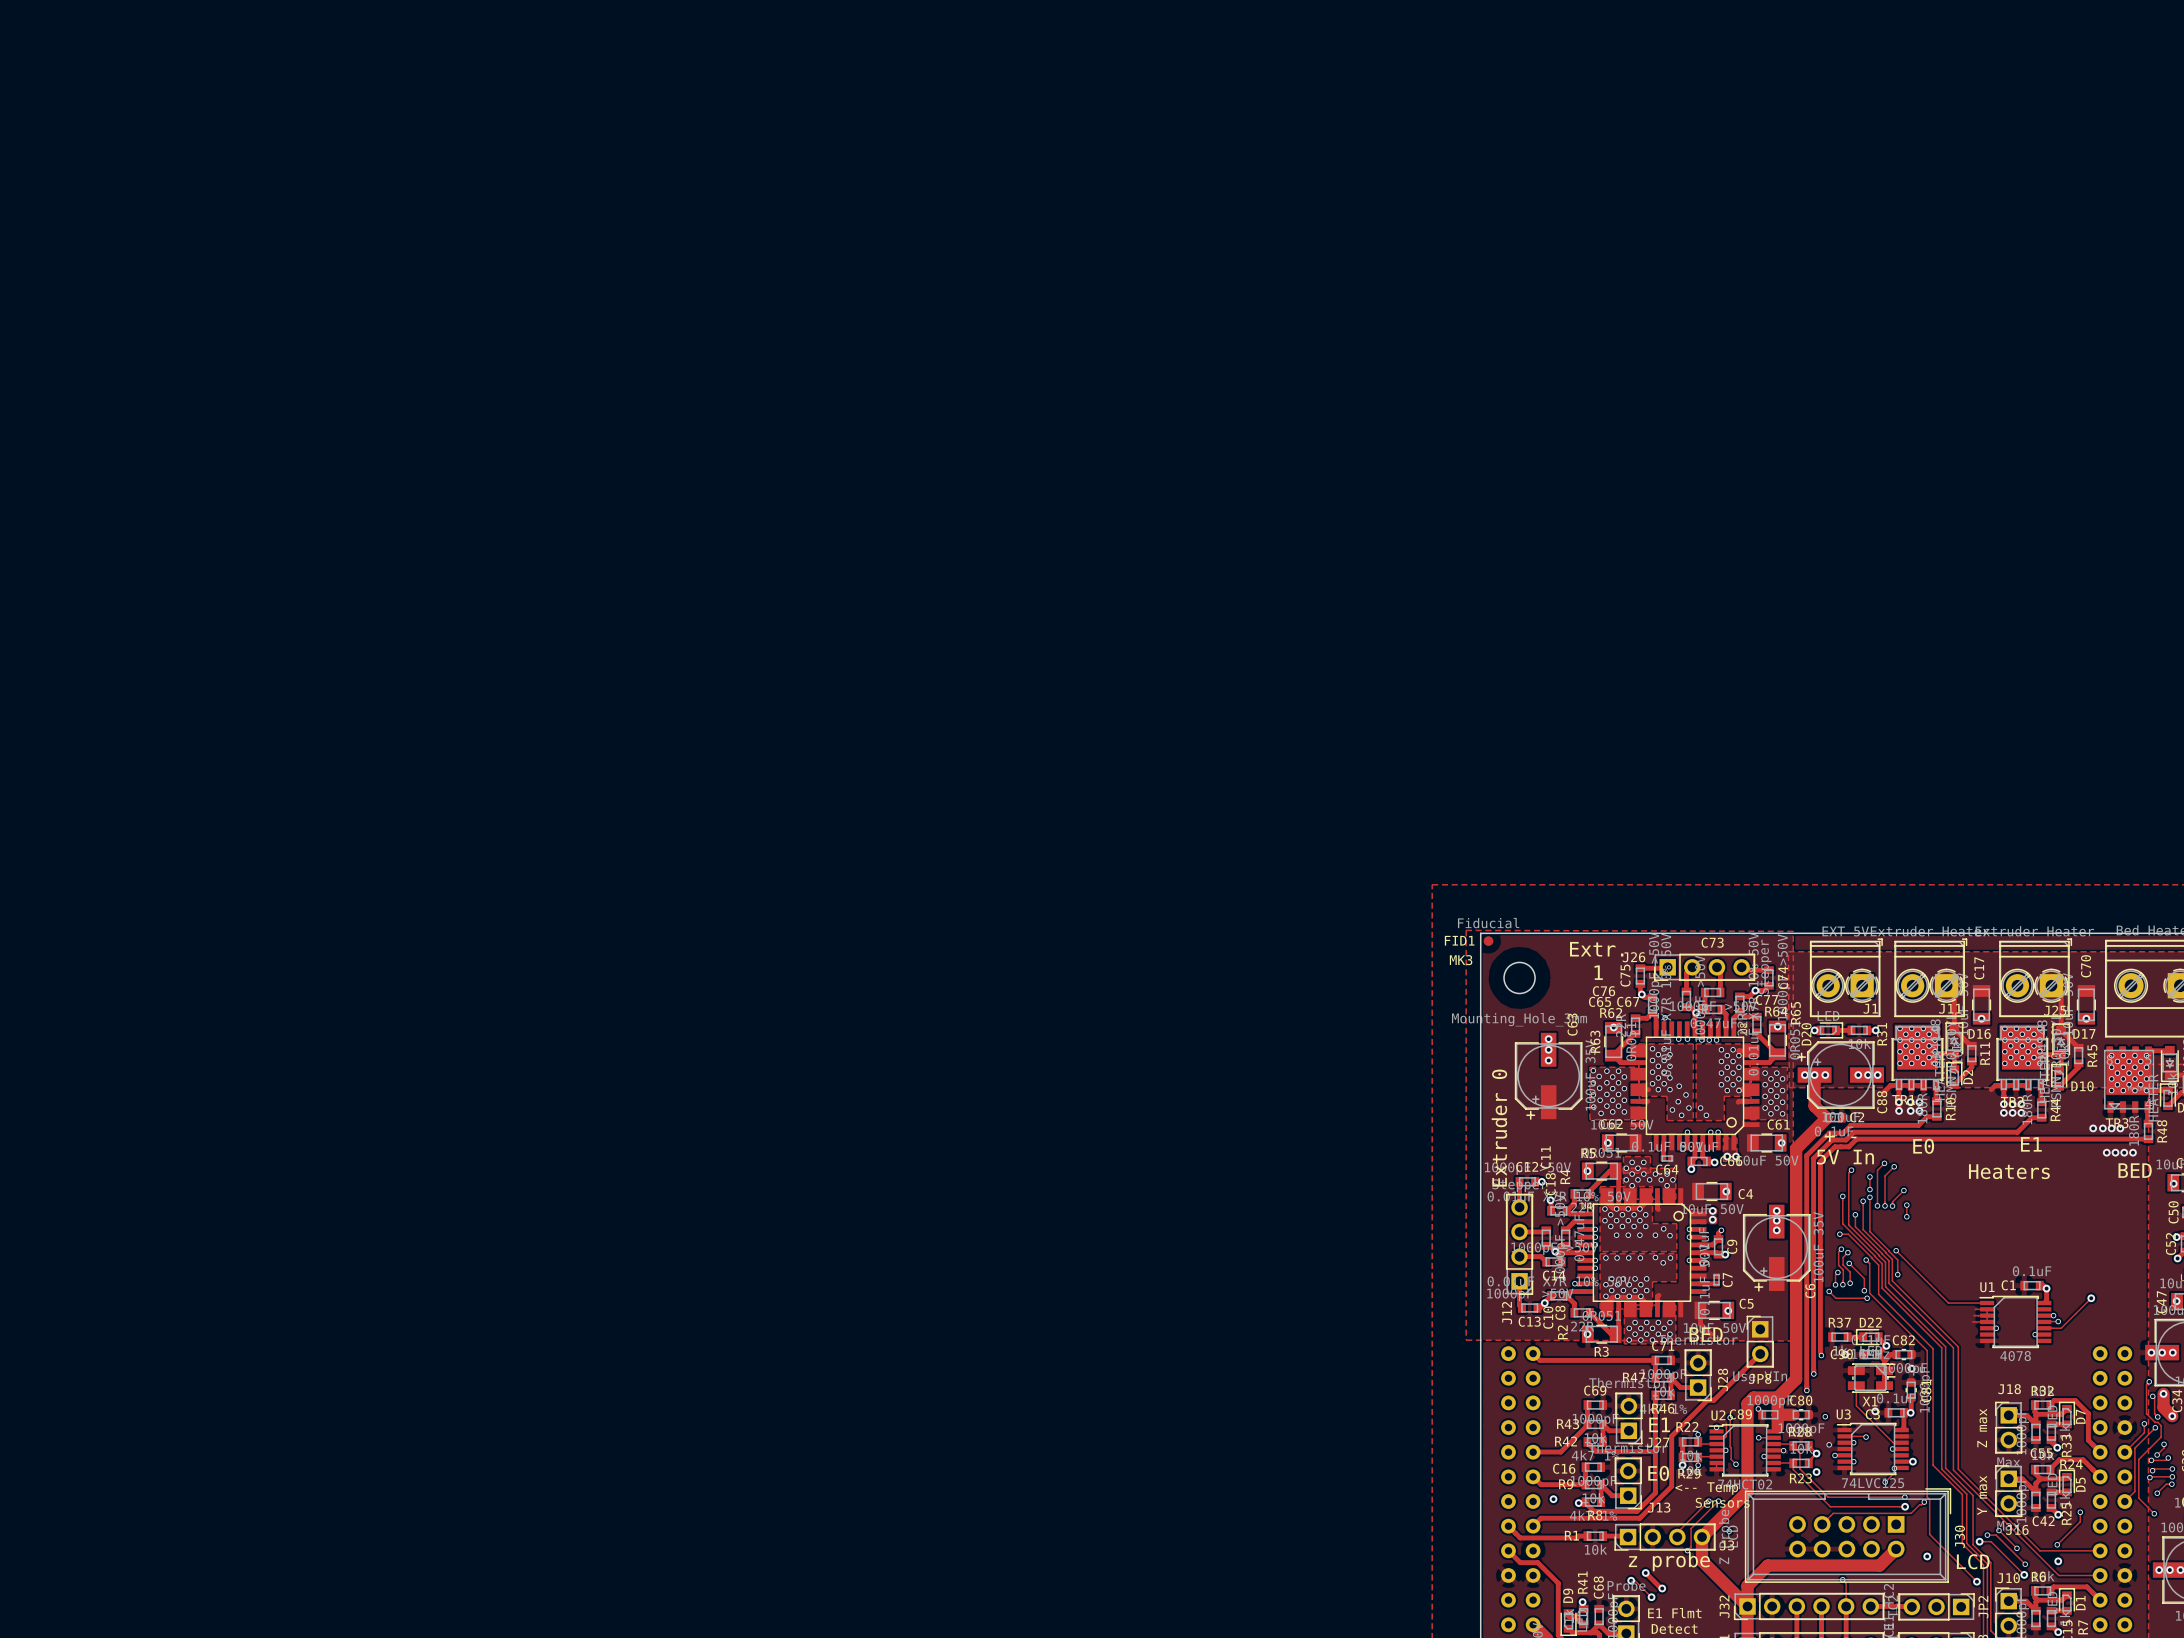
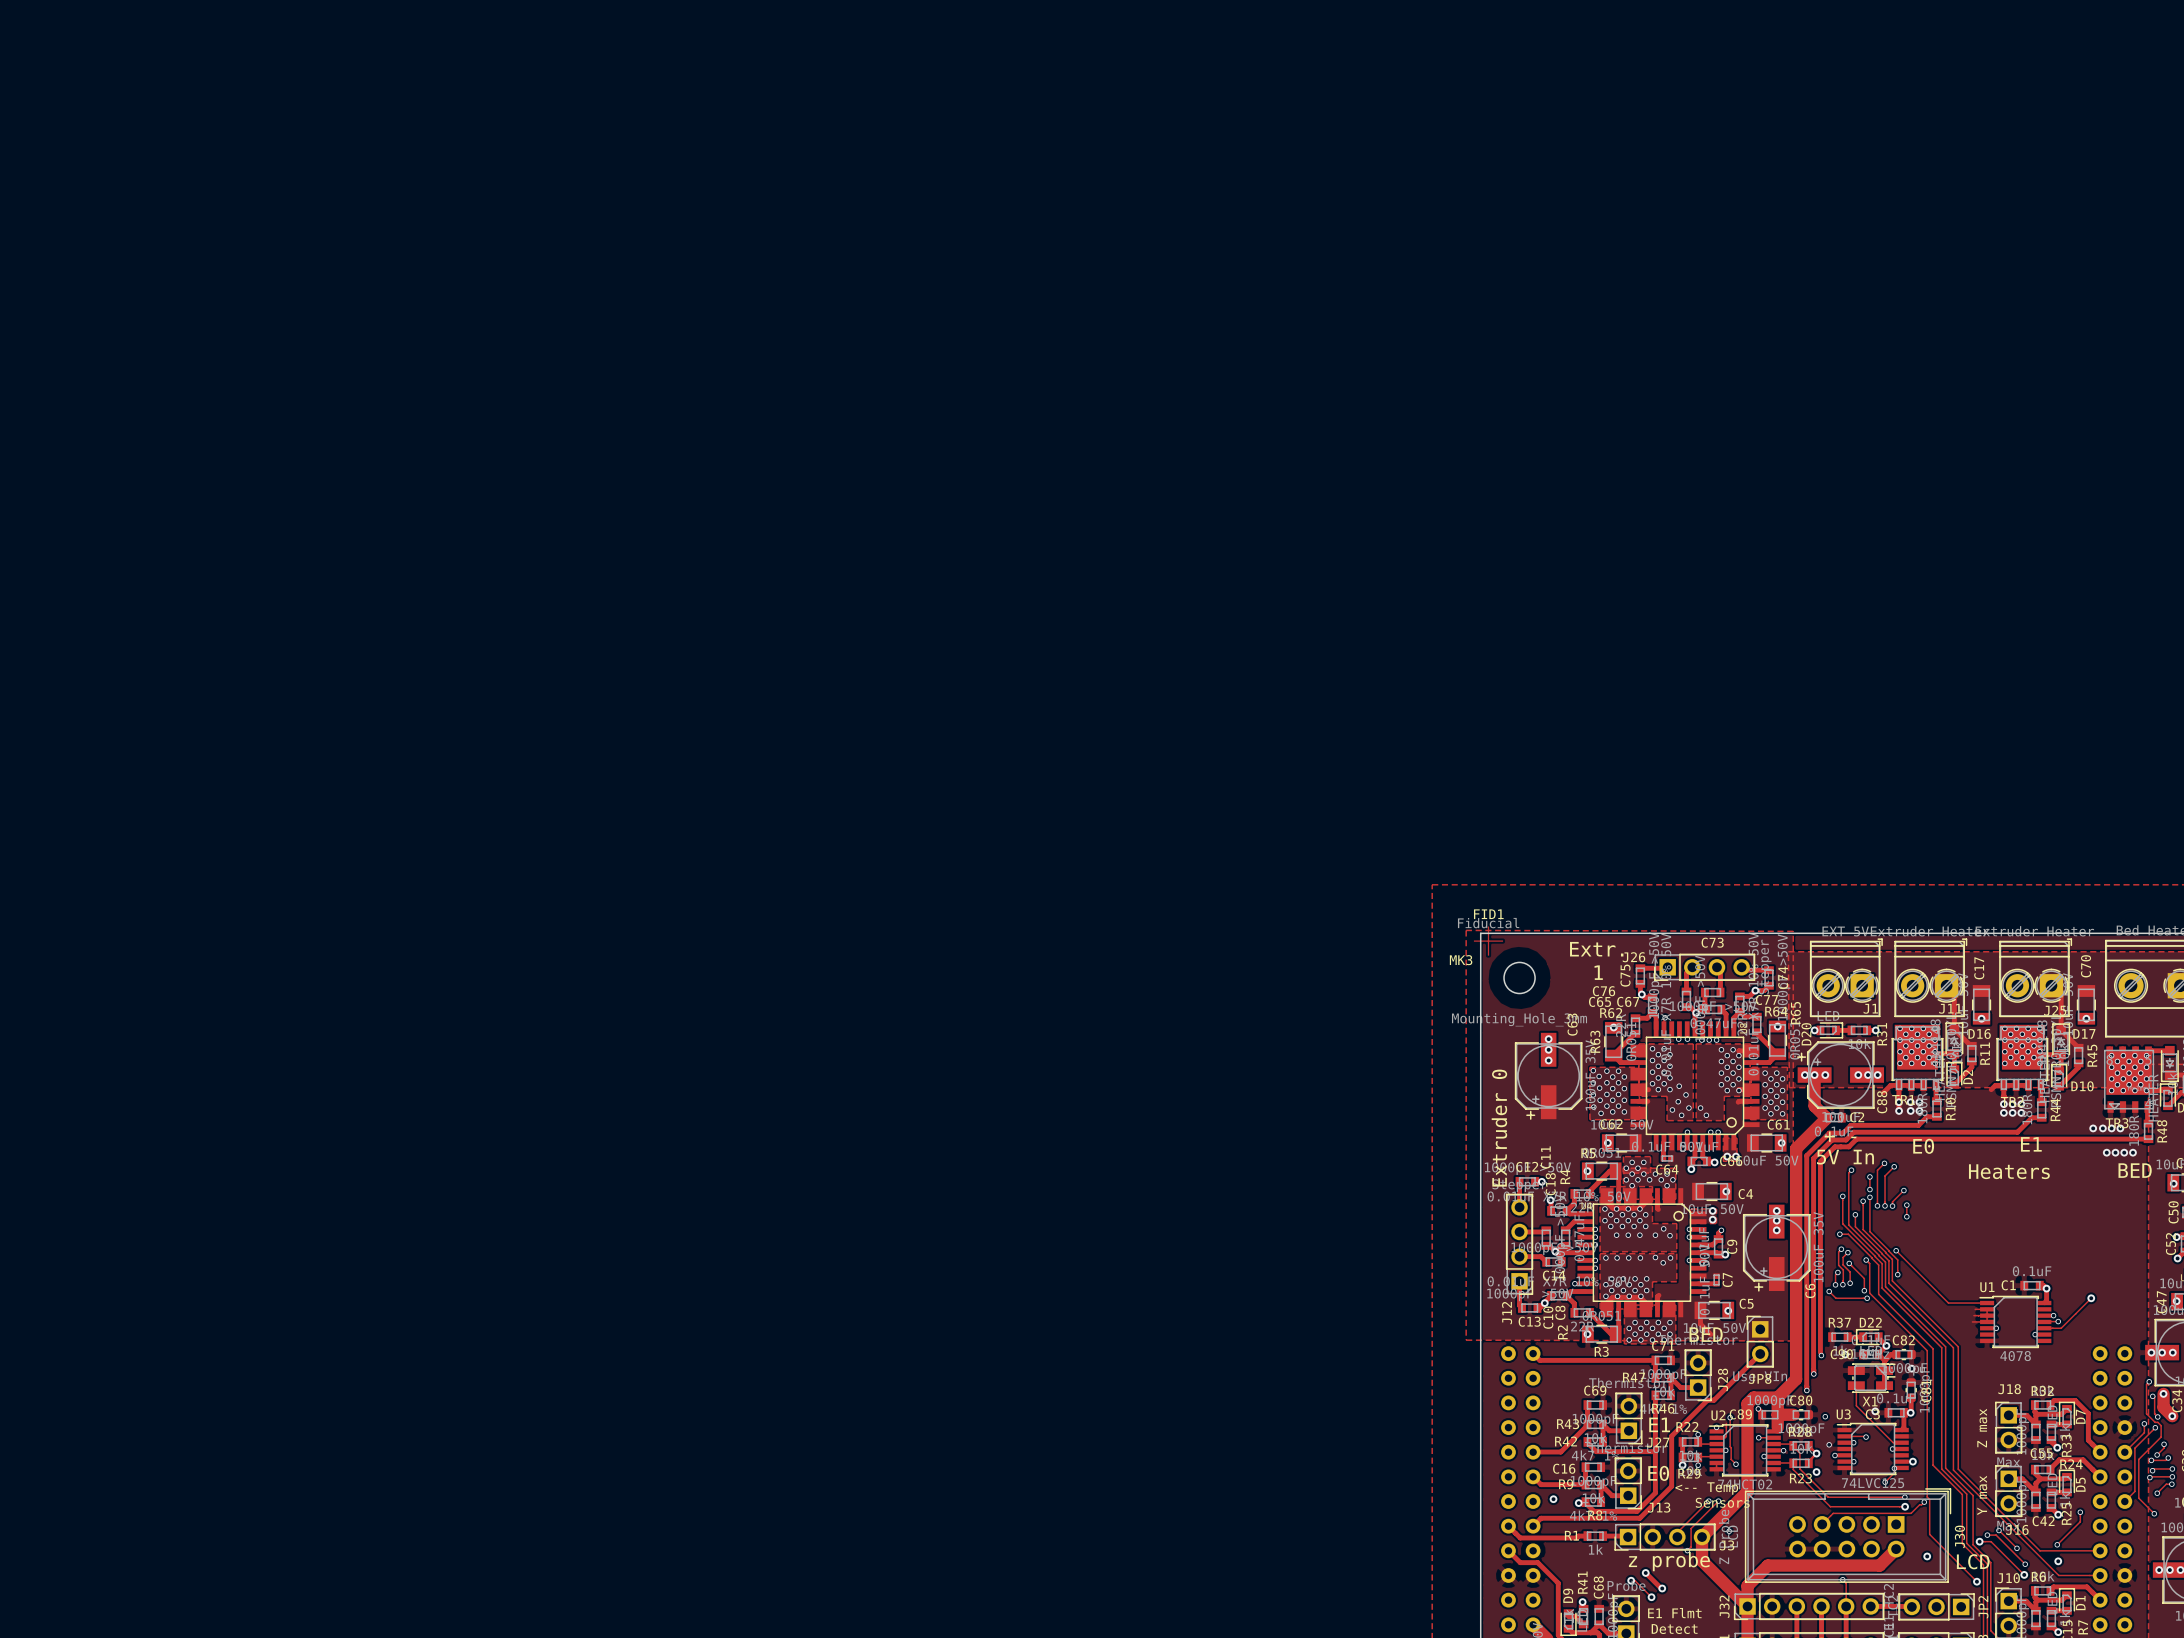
FID1 footprint: [1483, 936, 1494, 946] -> [1473, 926, 1504, 956]
FID1 name position: FID1 (1459, 940) -> FID1 (1488, 914)
R1 value: 10k (1595, 1549) -> 1k (1595, 1549)

